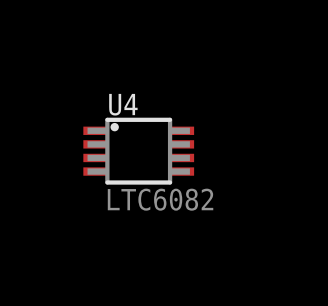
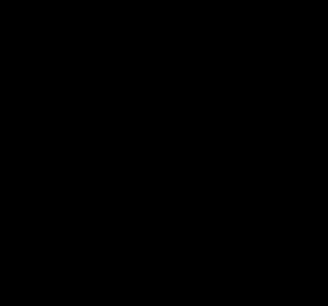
U4: LTC6082 (138, 151) -> none

